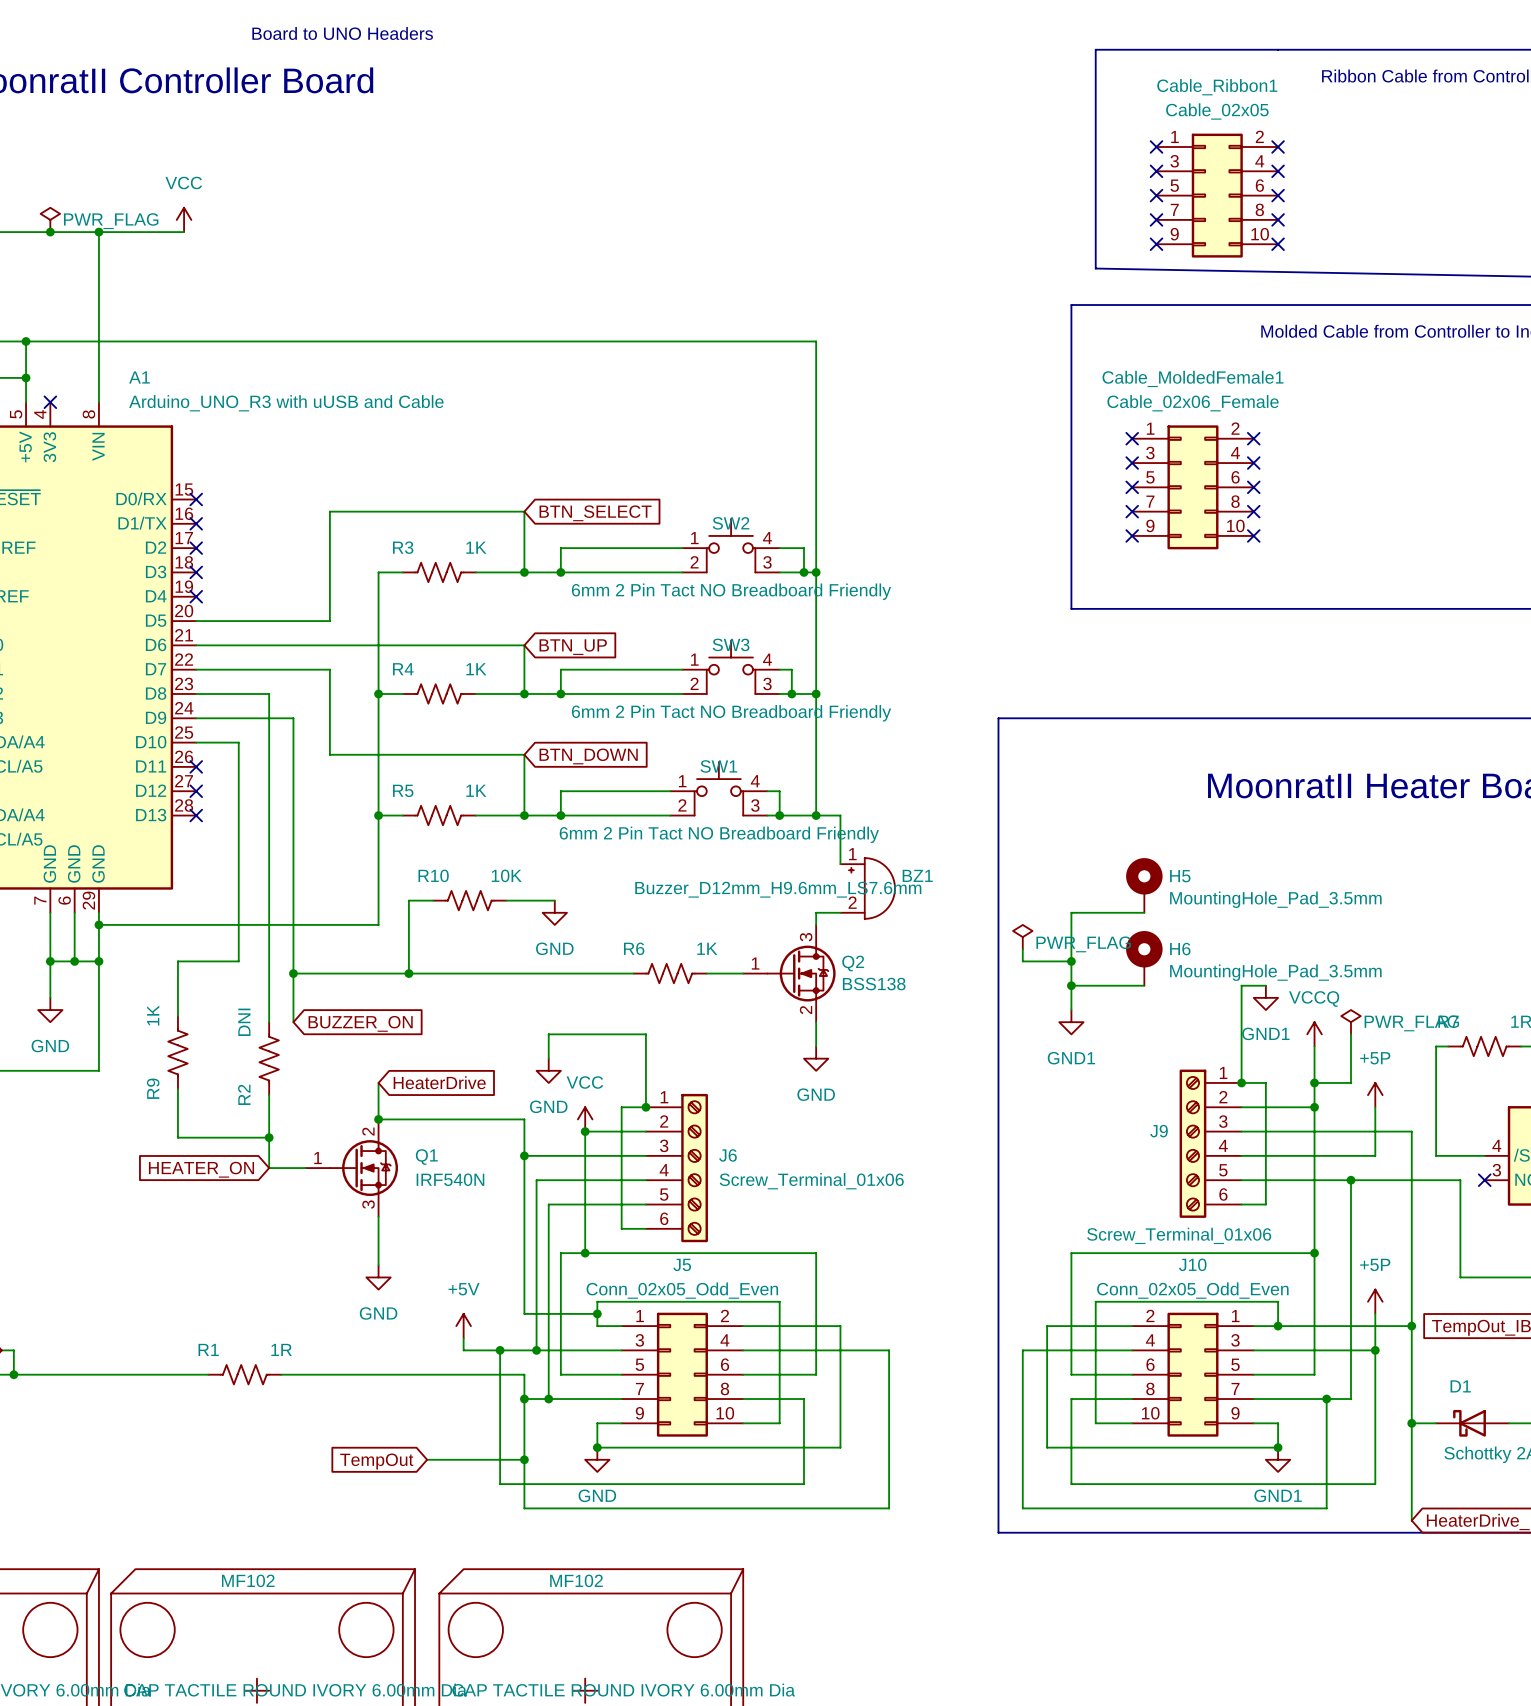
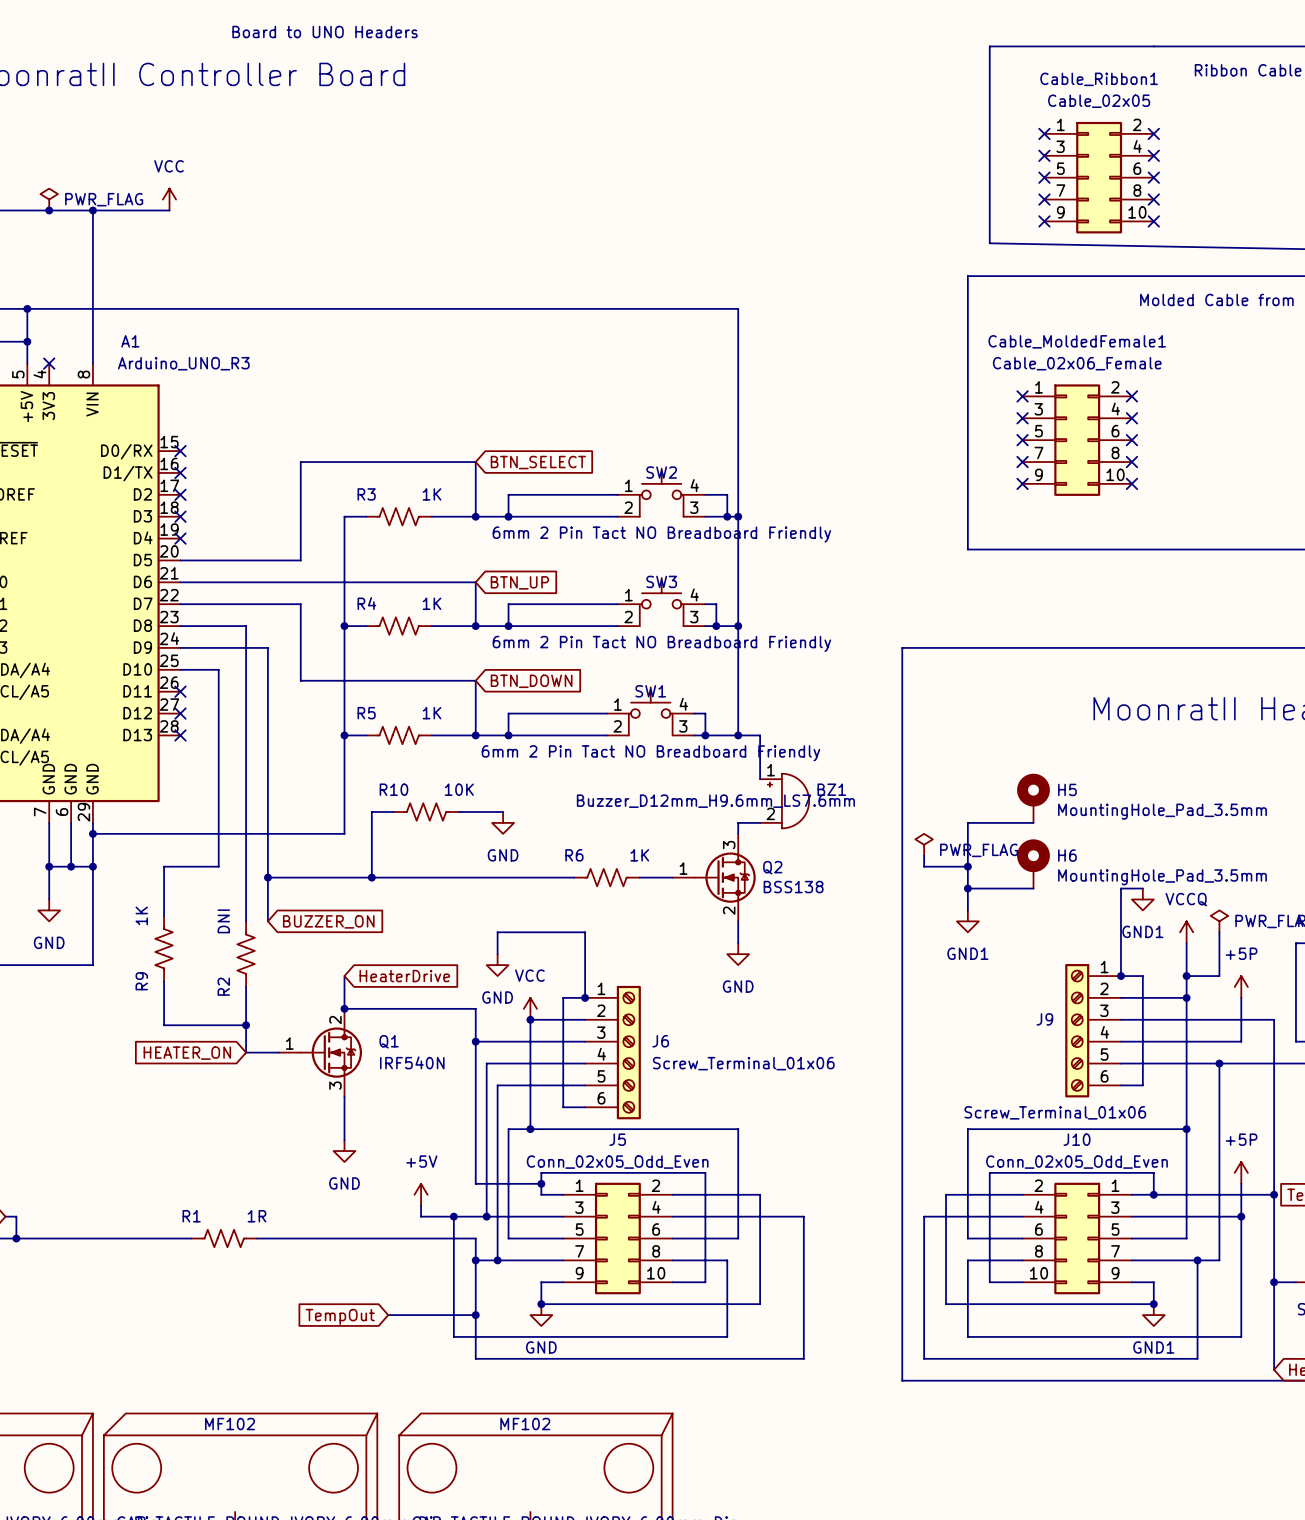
A1 value: Arduino_UNO_R3 with uUSB and Cable (286, 403) -> Arduino_UNO_R3 (183, 363)

